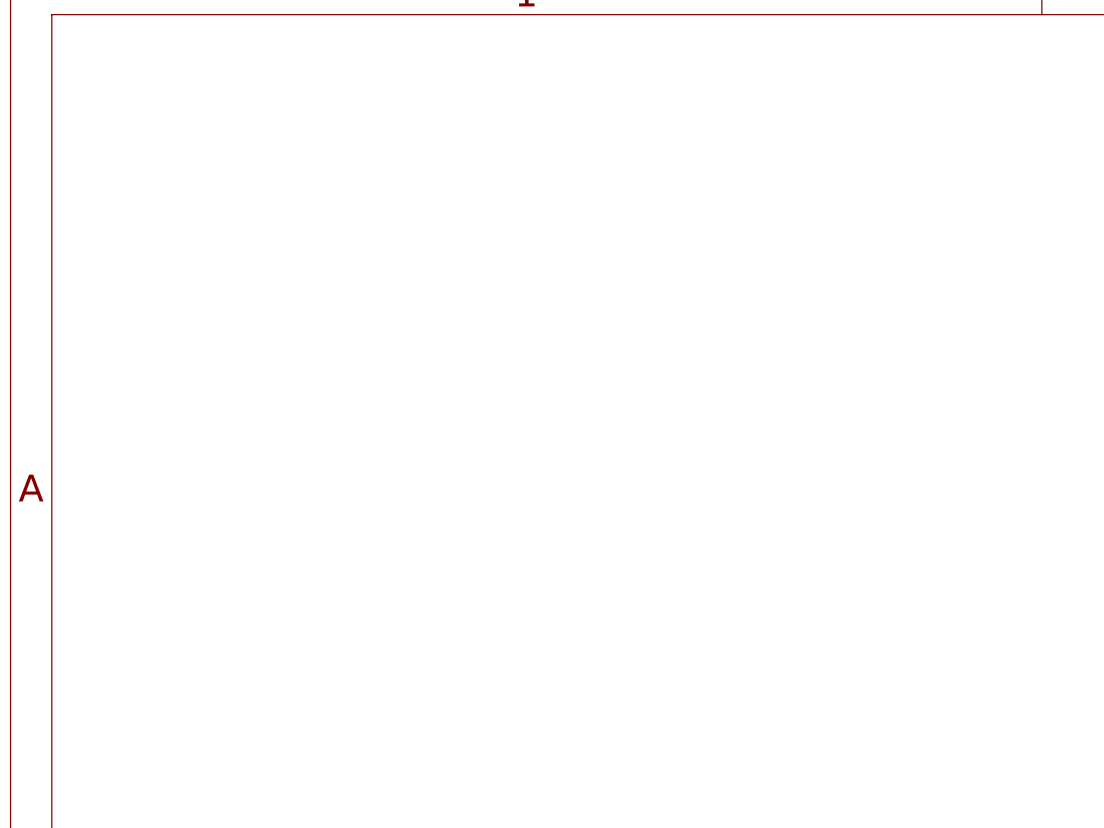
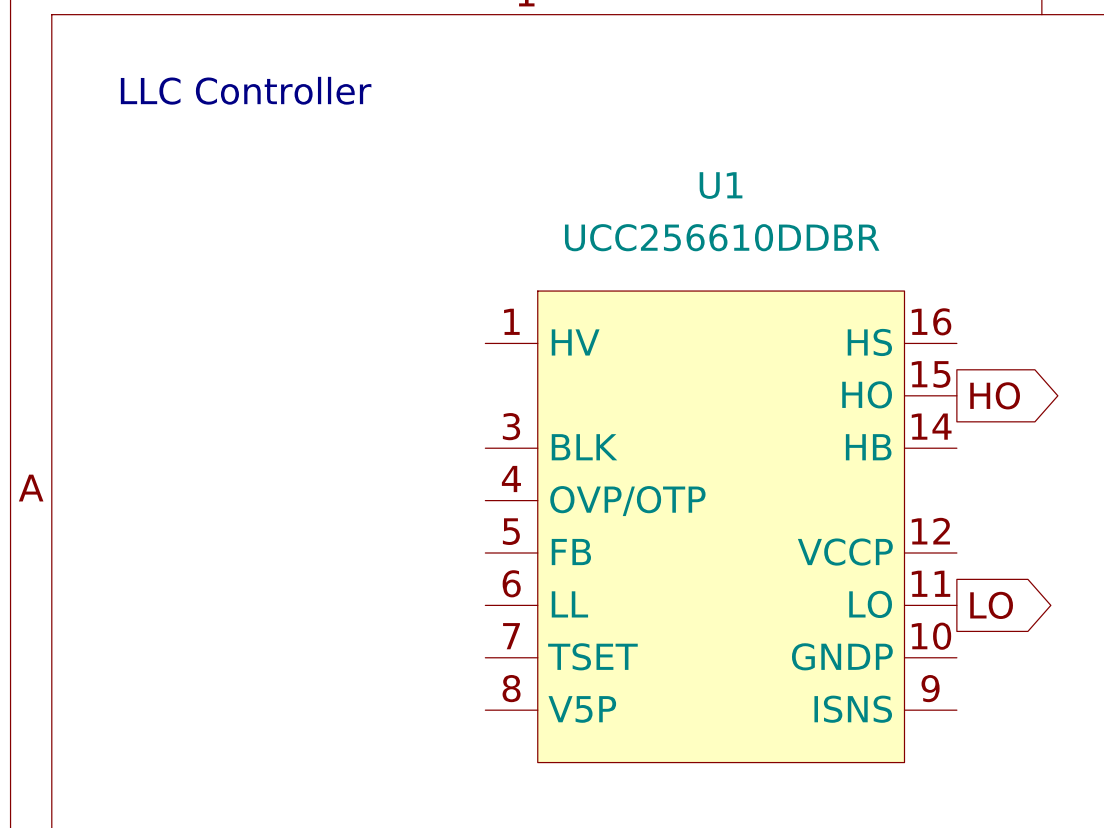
text: none -> LLC Controller (246, 90)
global label: none -> HO (995, 395)
U1: none -> UCC256610DDBR (721, 526)
global label: none -> LO (991, 605)

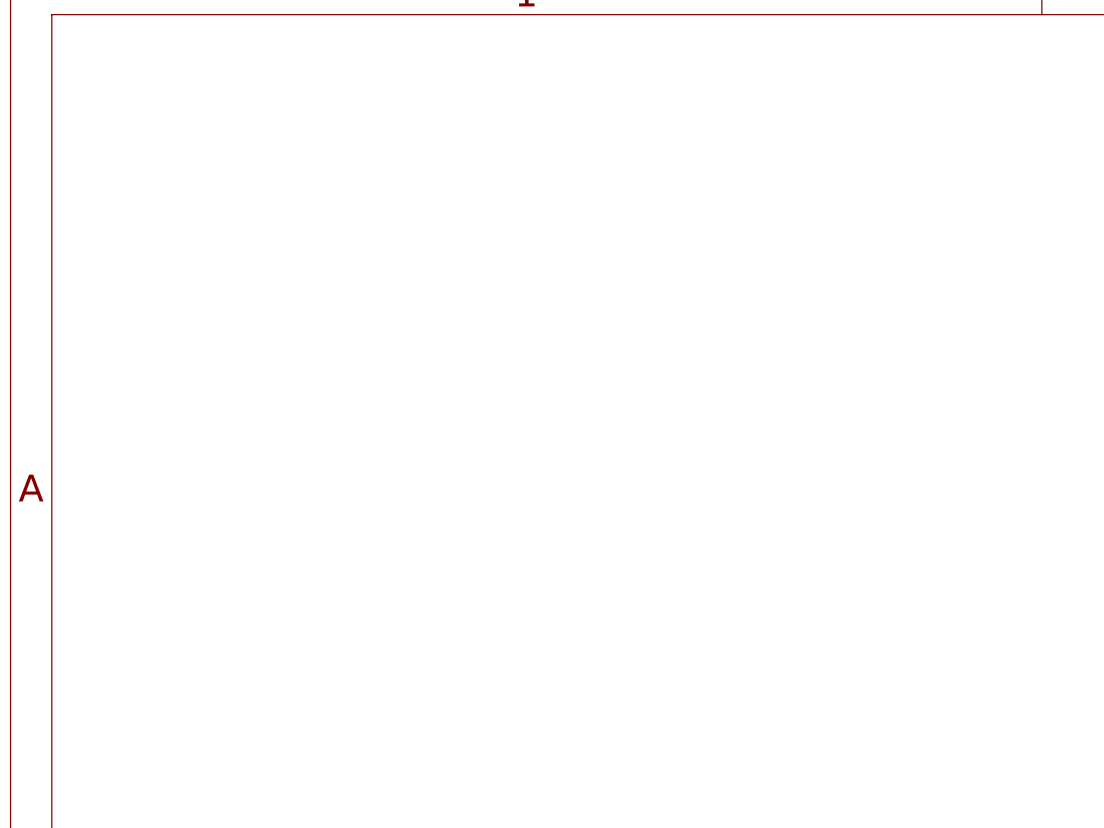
text: LLC Controller (246, 90) -> none
global label: HO (995, 395) -> none
U1: UCC256610DDBR (721, 526) -> none
global label: LO (991, 605) -> none

